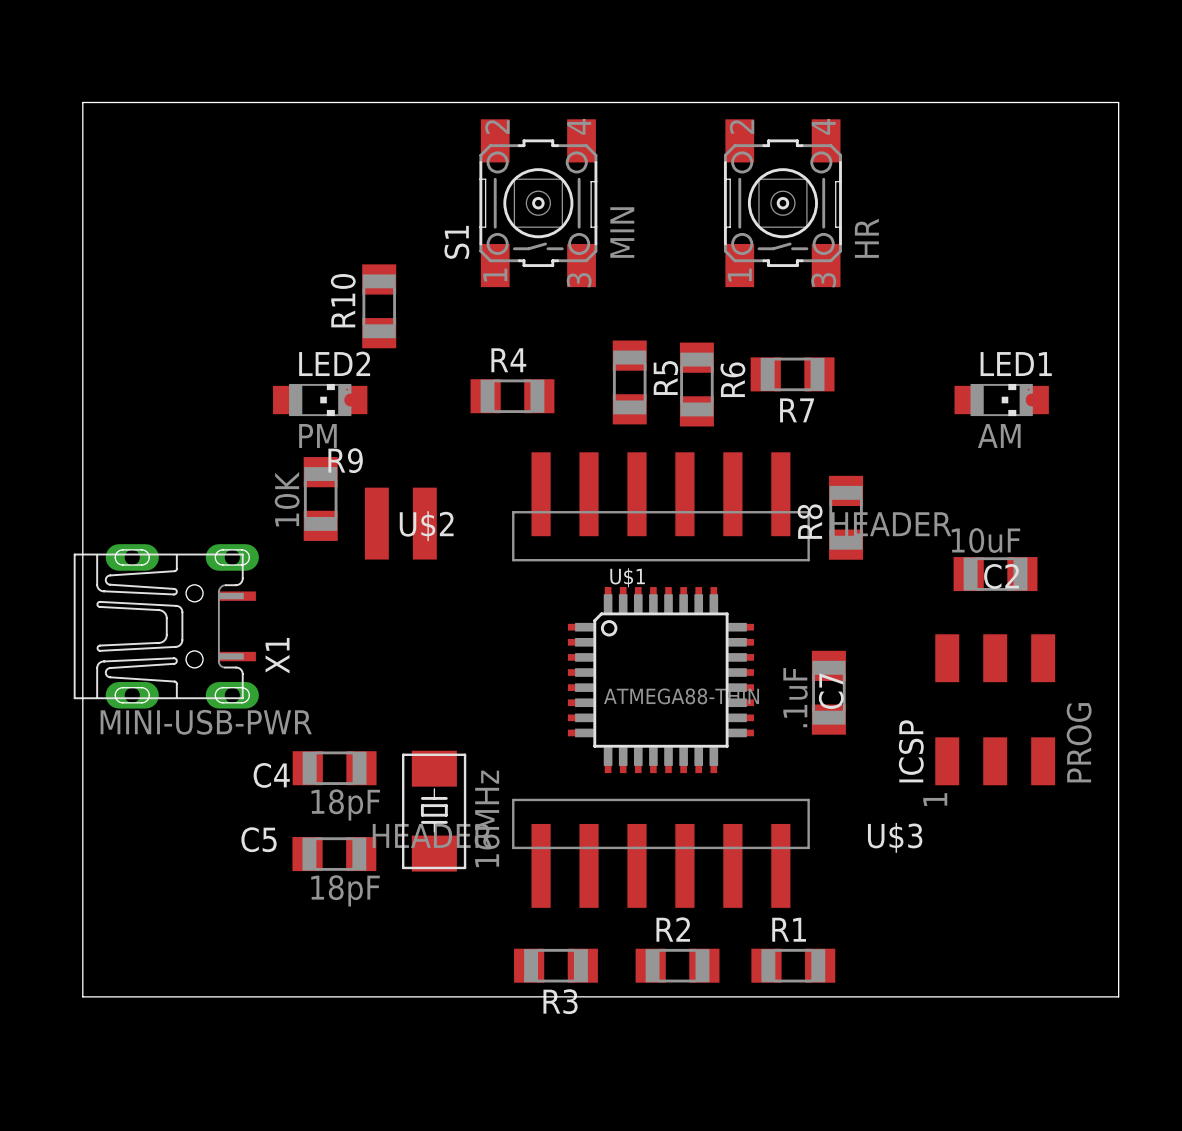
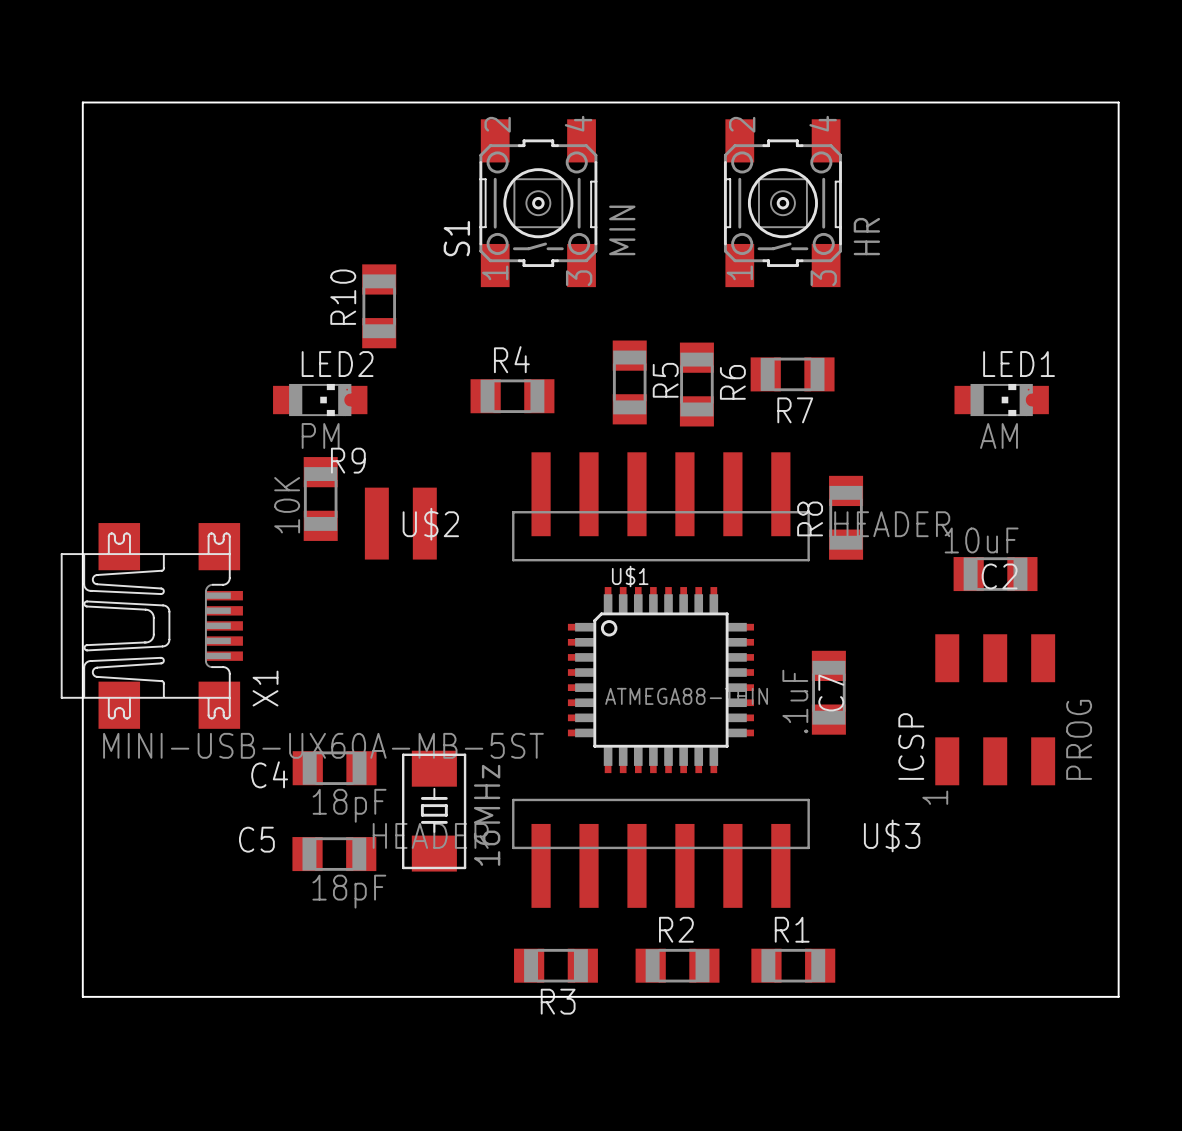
X1 footprint: [73, 544, 259, 709] -> [60, 523, 243, 729]
X1 value: MINI-USB-PWR (206, 722) -> MINI-USB-UX60A-MB-5ST (323, 745)

